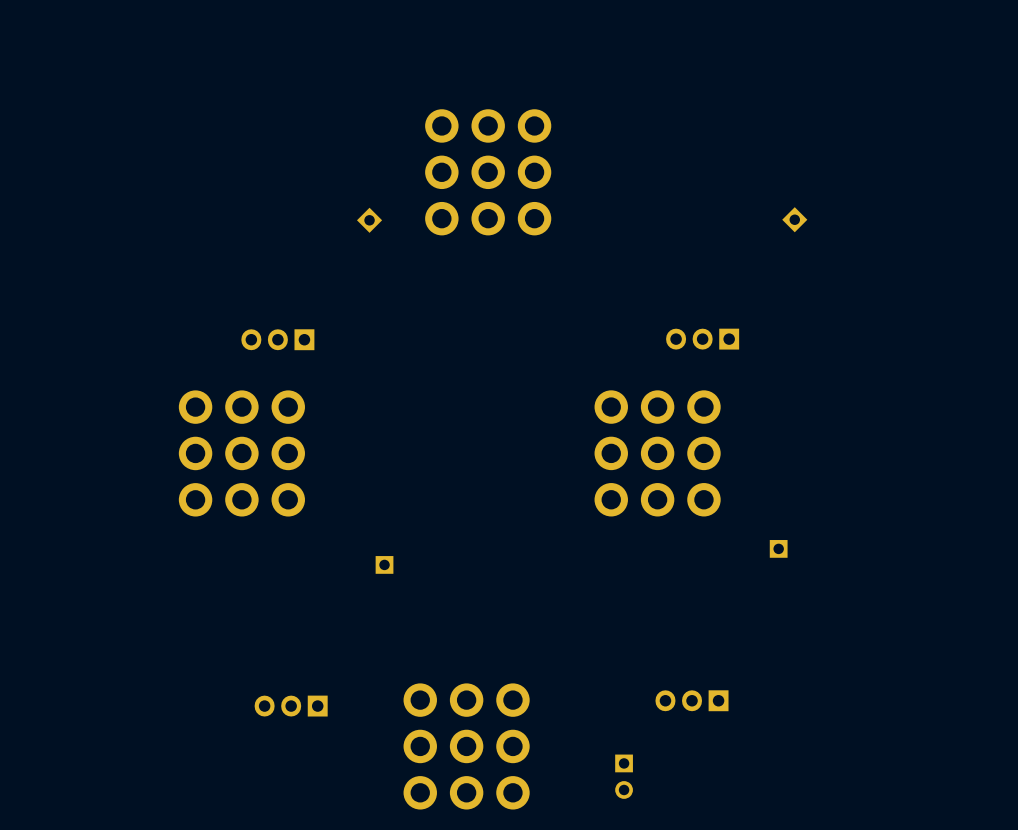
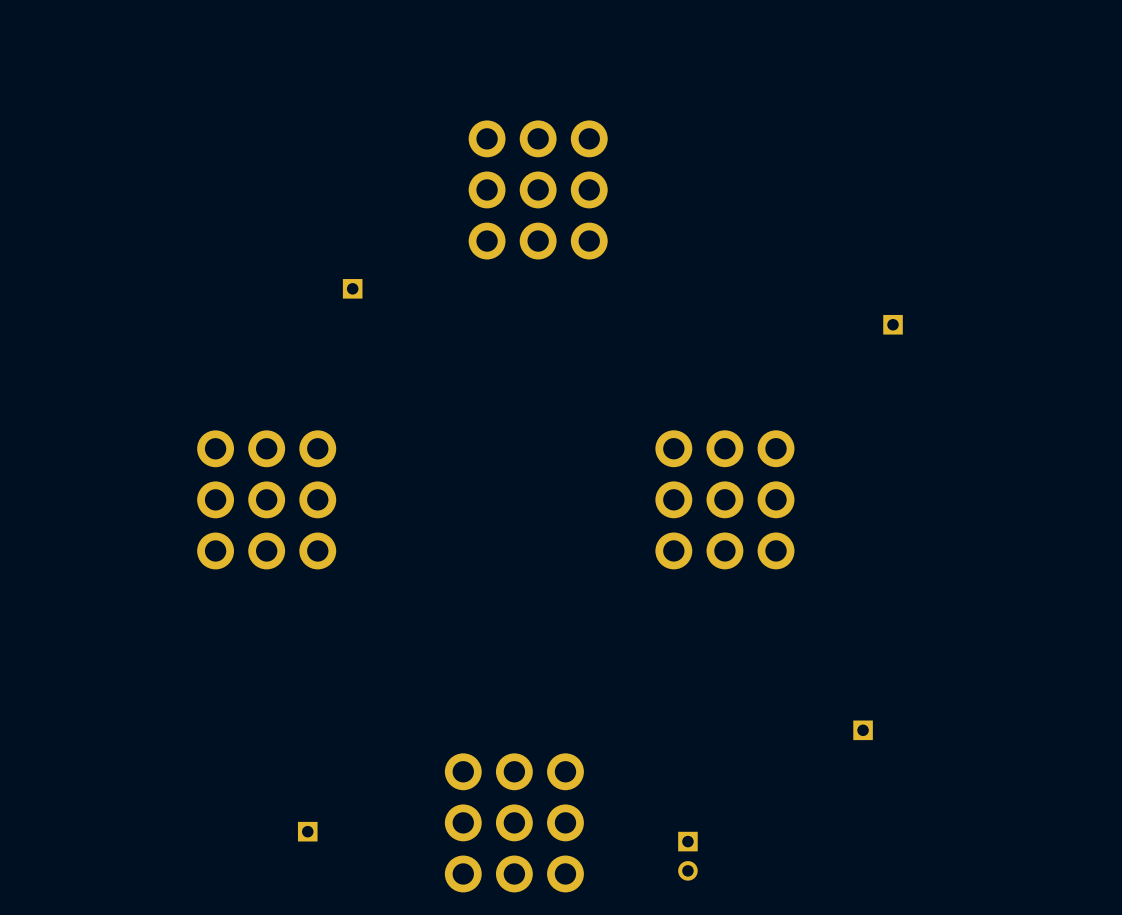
part: (794, 219) -> none
part: (369, 220) -> none
part: none -> (352, 288)
part: none -> (893, 324)
part: (277, 339) -> none
part: (702, 339) -> none
part position: (778, 548) -> (863, 730)
part: (384, 564) -> none
part: (692, 700) -> none
part: (291, 706) -> none
part: none -> (307, 831)

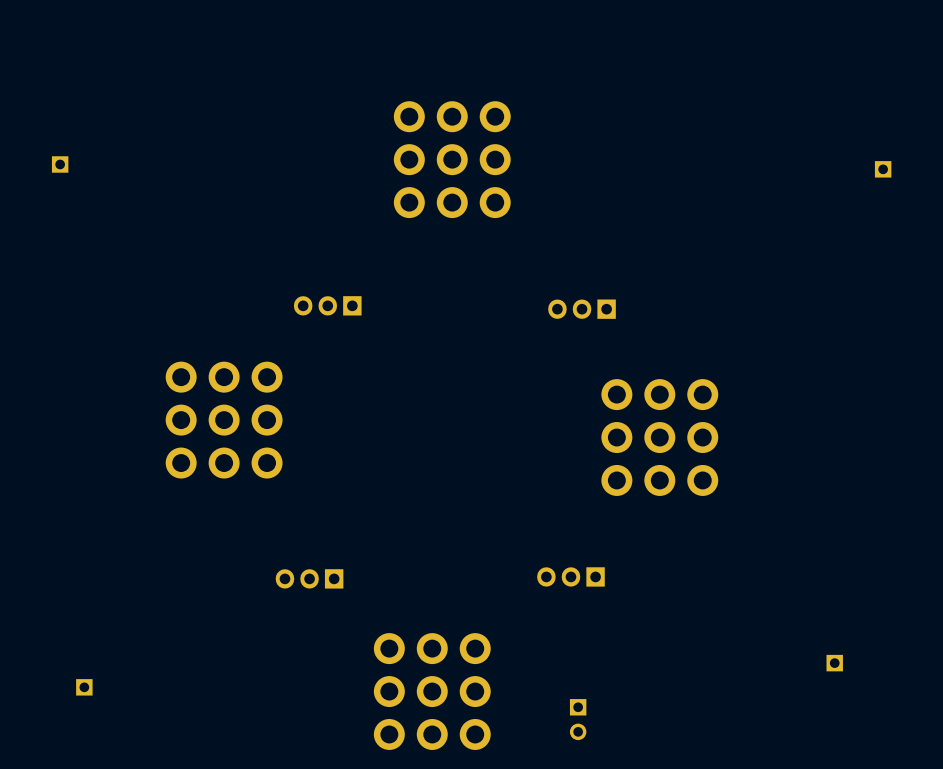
part: none -> (60, 164)
part: (352, 288) -> none
part position: (893, 324) -> (883, 169)
part: none -> (327, 305)
part: none -> (582, 309)
part position: (724, 499) -> (659, 437)
part: none -> (570, 576)
part: none -> (309, 578)
part position: (863, 730) -> (834, 663)
part position: (307, 831) -> (84, 687)

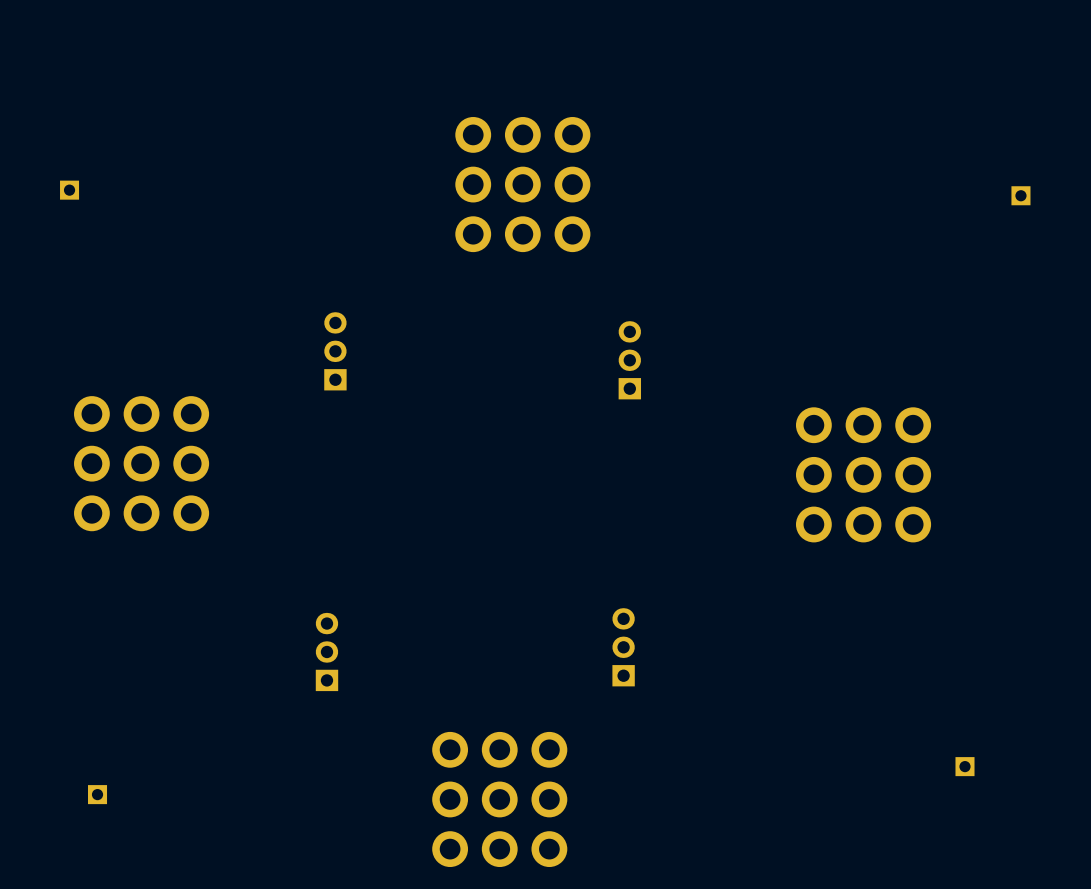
part rotation: 0° (327, 305) -> 90° clockwise (335, 351)
part rotation: 0° (582, 309) -> 90° clockwise (629, 360)
part position: (224, 420) -> (141, 463)
part position: (659, 437) -> (863, 474)
part rotation: 0° (570, 576) -> 90° clockwise (623, 647)
part rotation: 0° (309, 578) -> 90° clockwise (326, 651)
part: (578, 719) -> none

